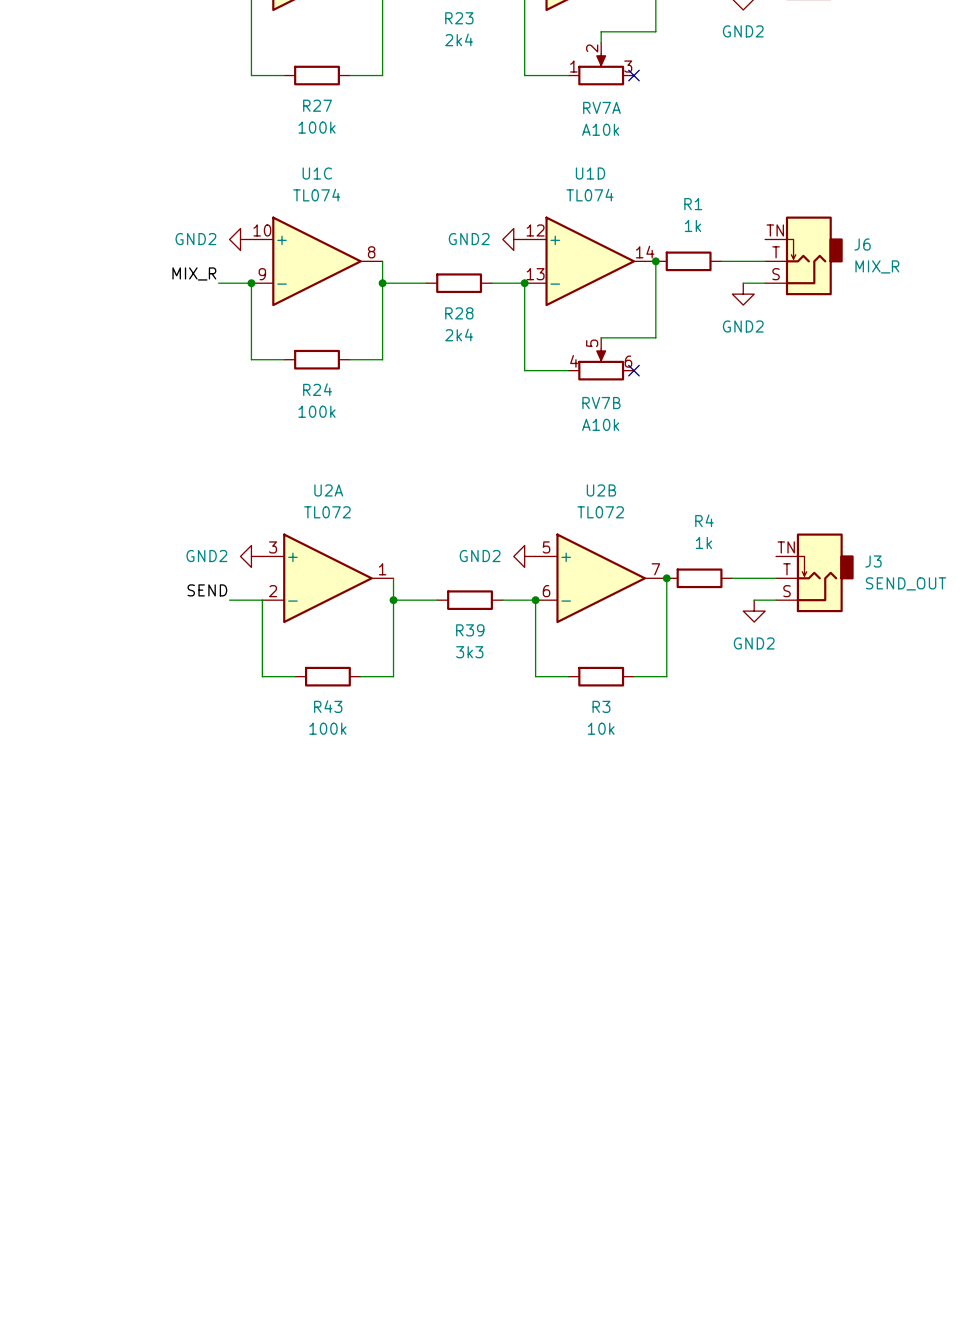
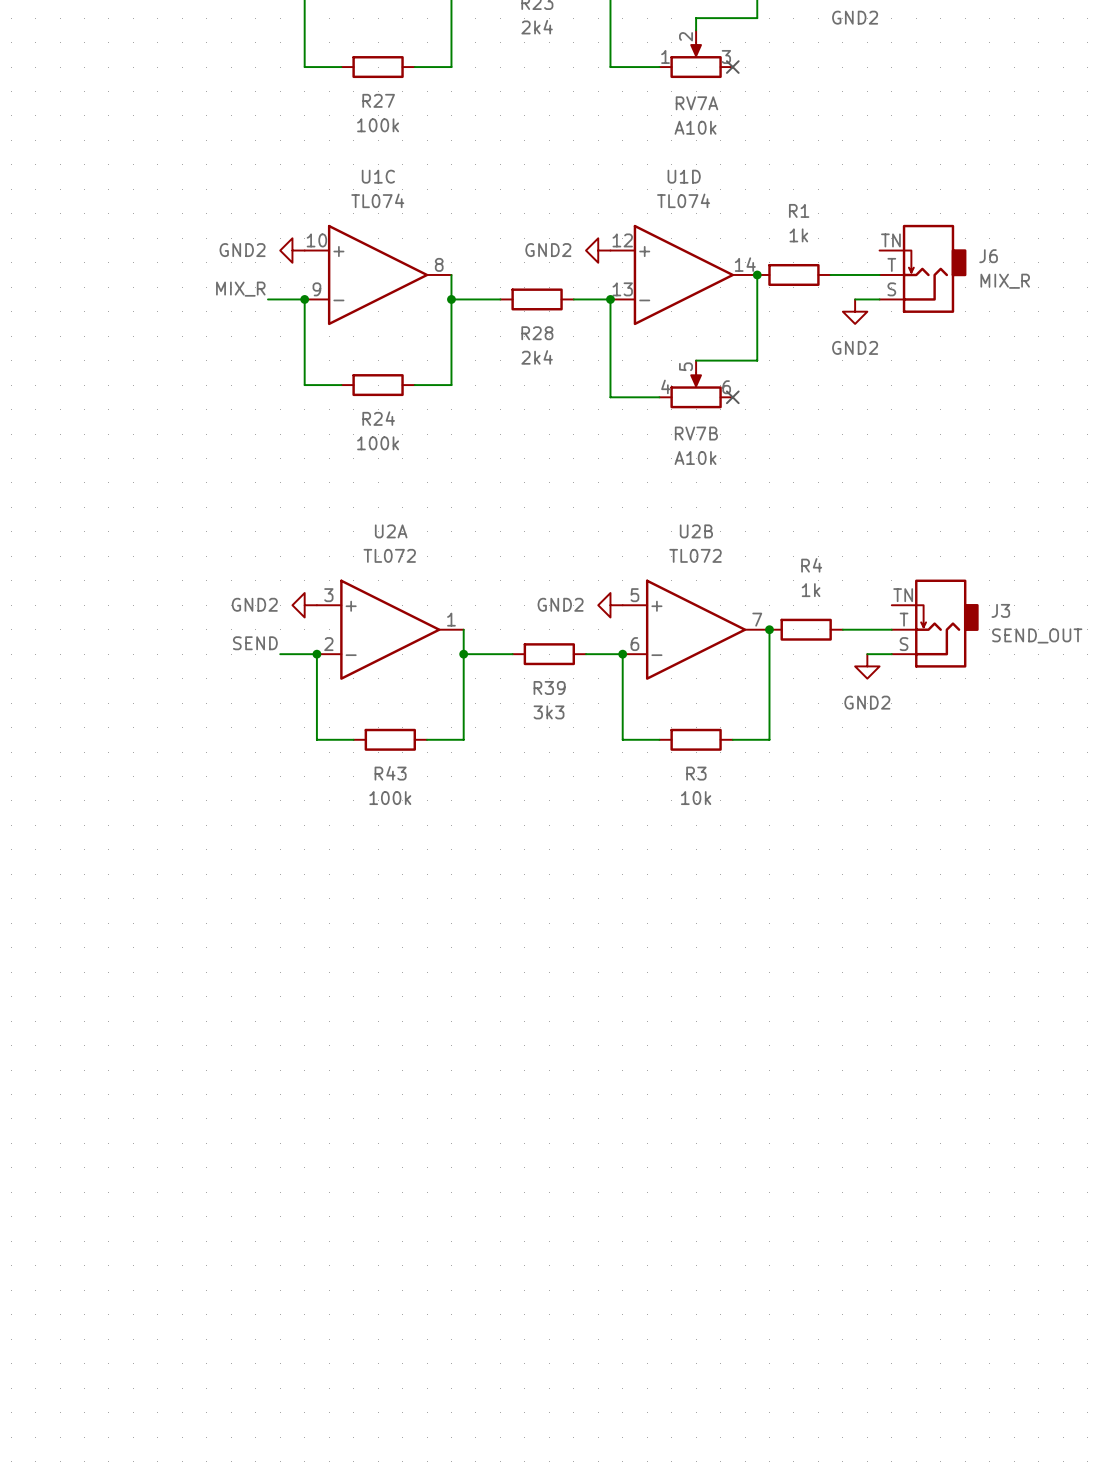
junction: none -> (316, 654)

